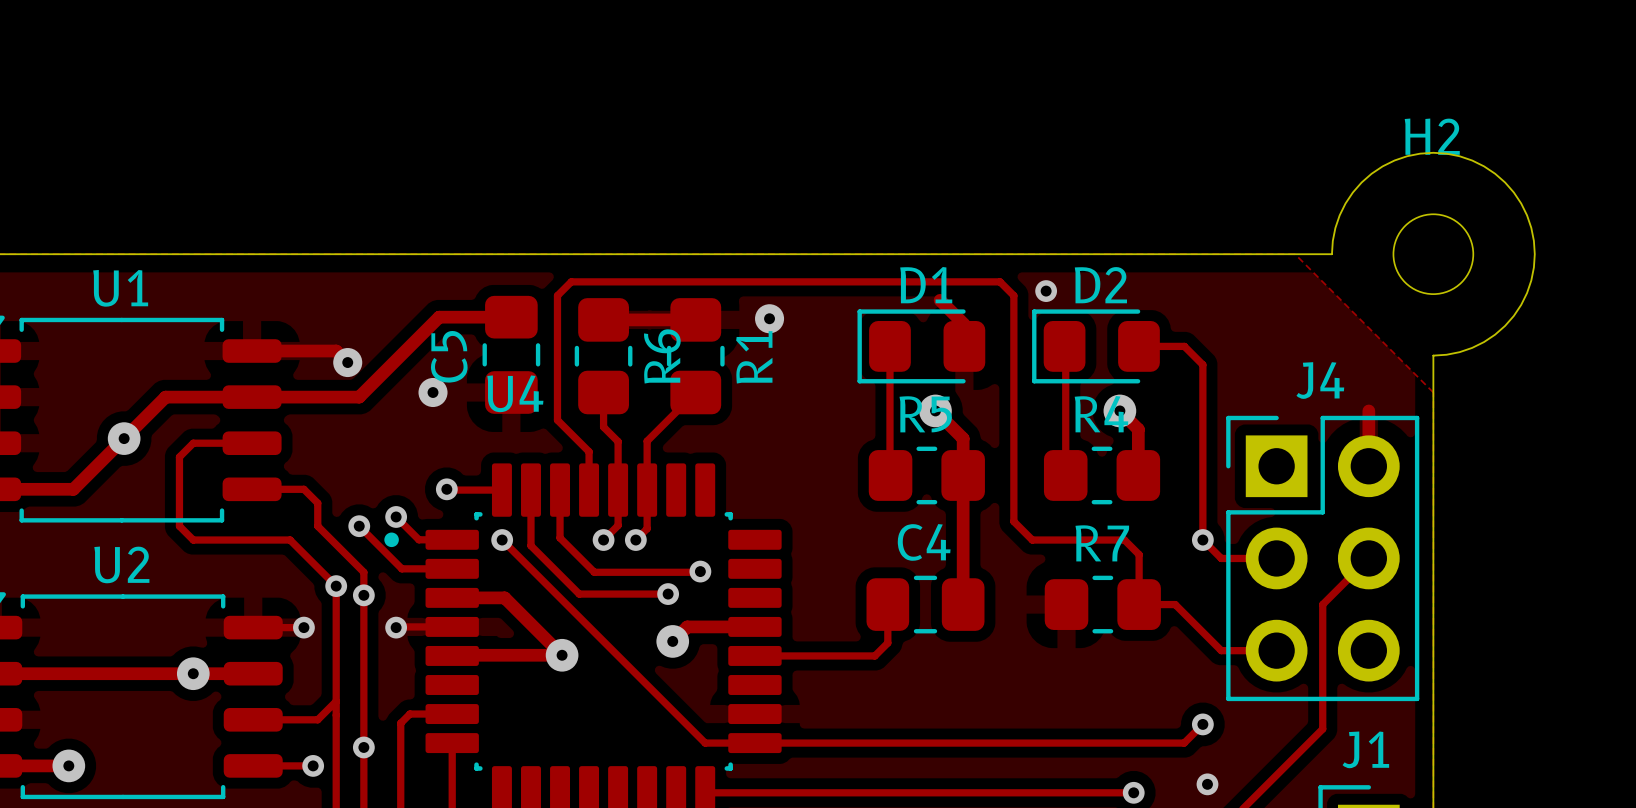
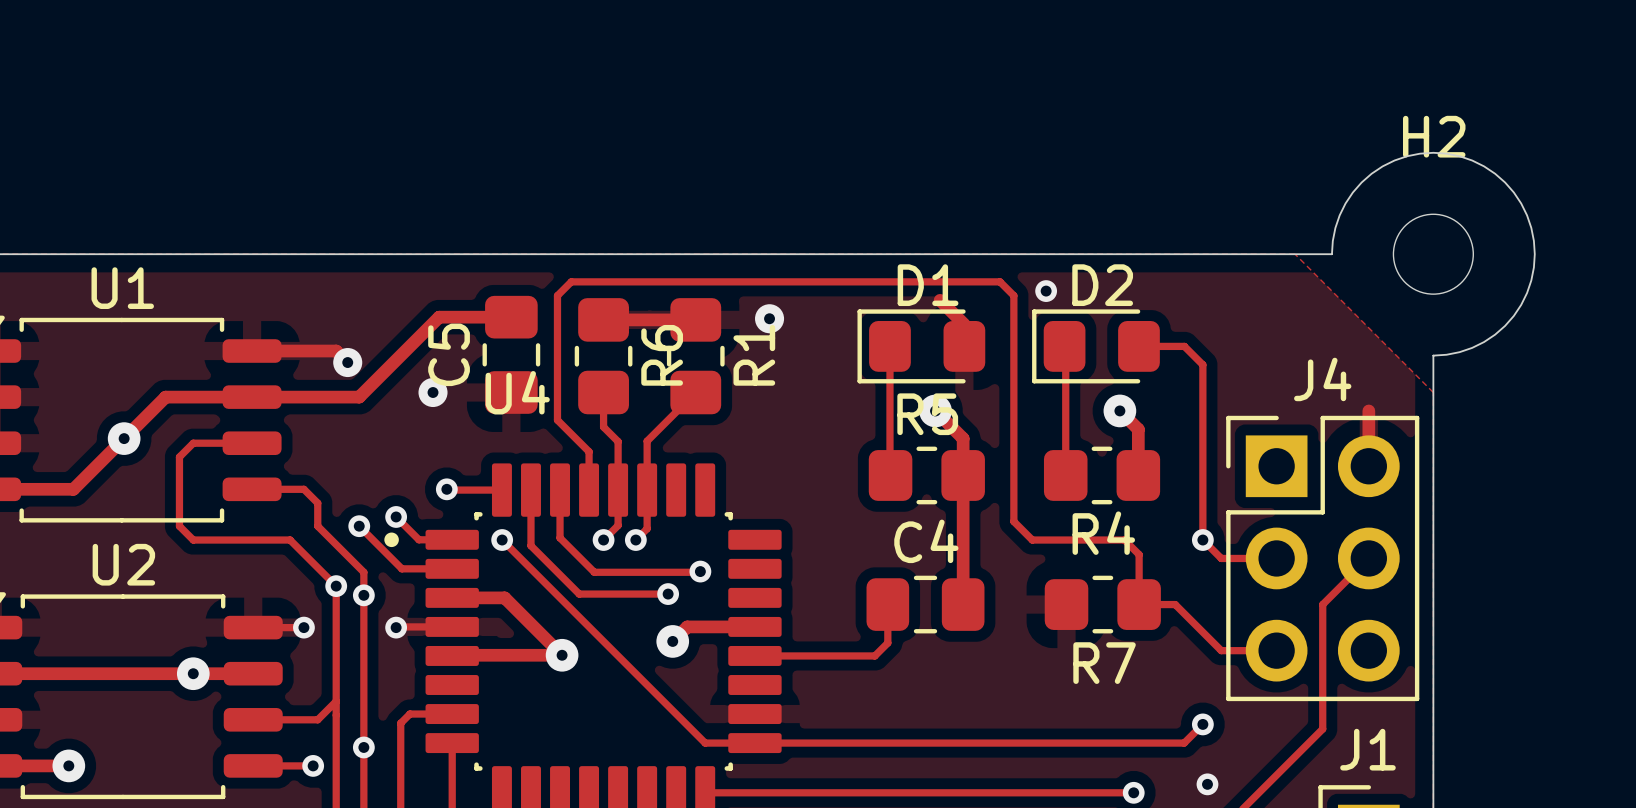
R4 name position: R4 (1101, 414) -> R4 (1103, 533)
R7 name position: R7 (1102, 543) -> R7 (1104, 663)

